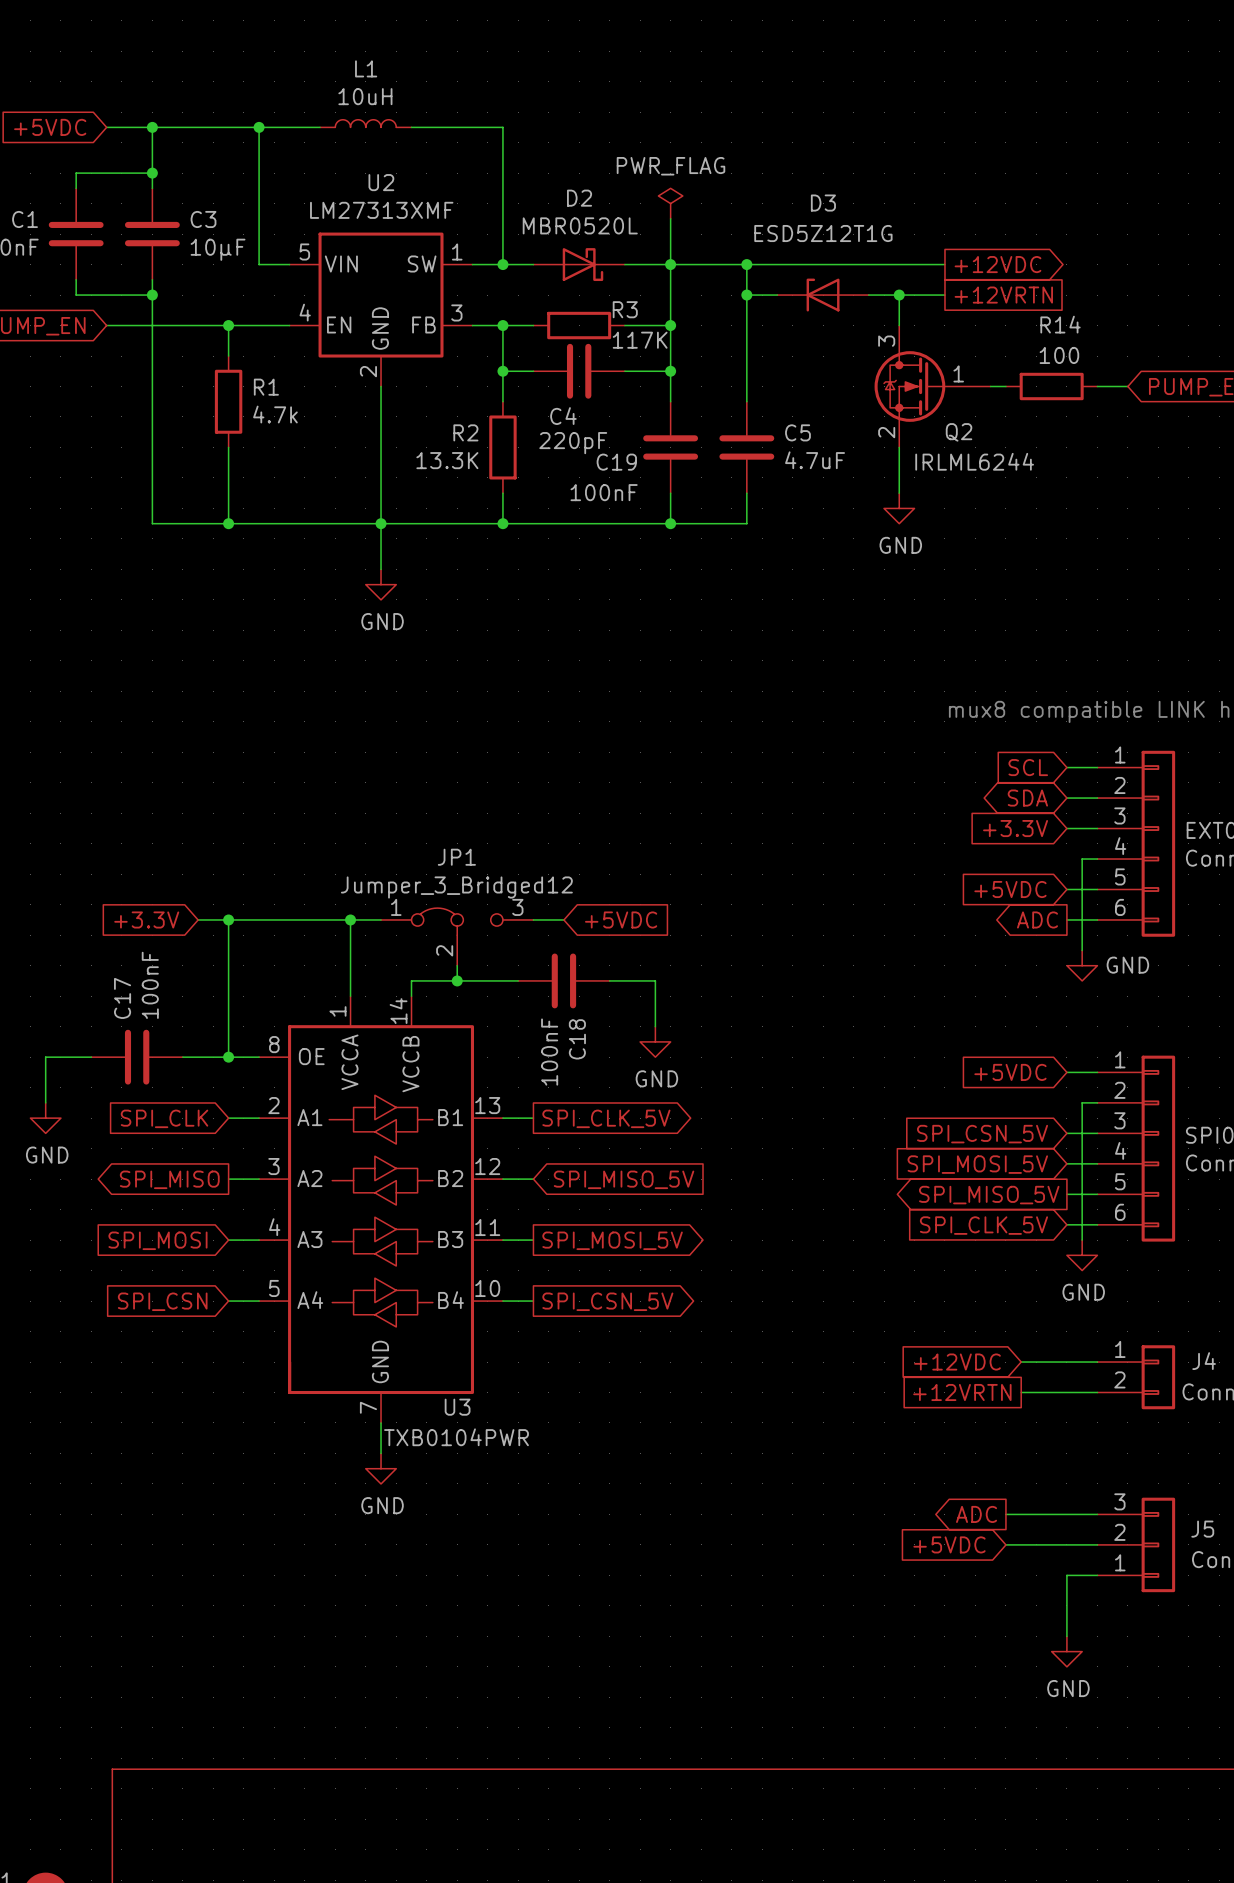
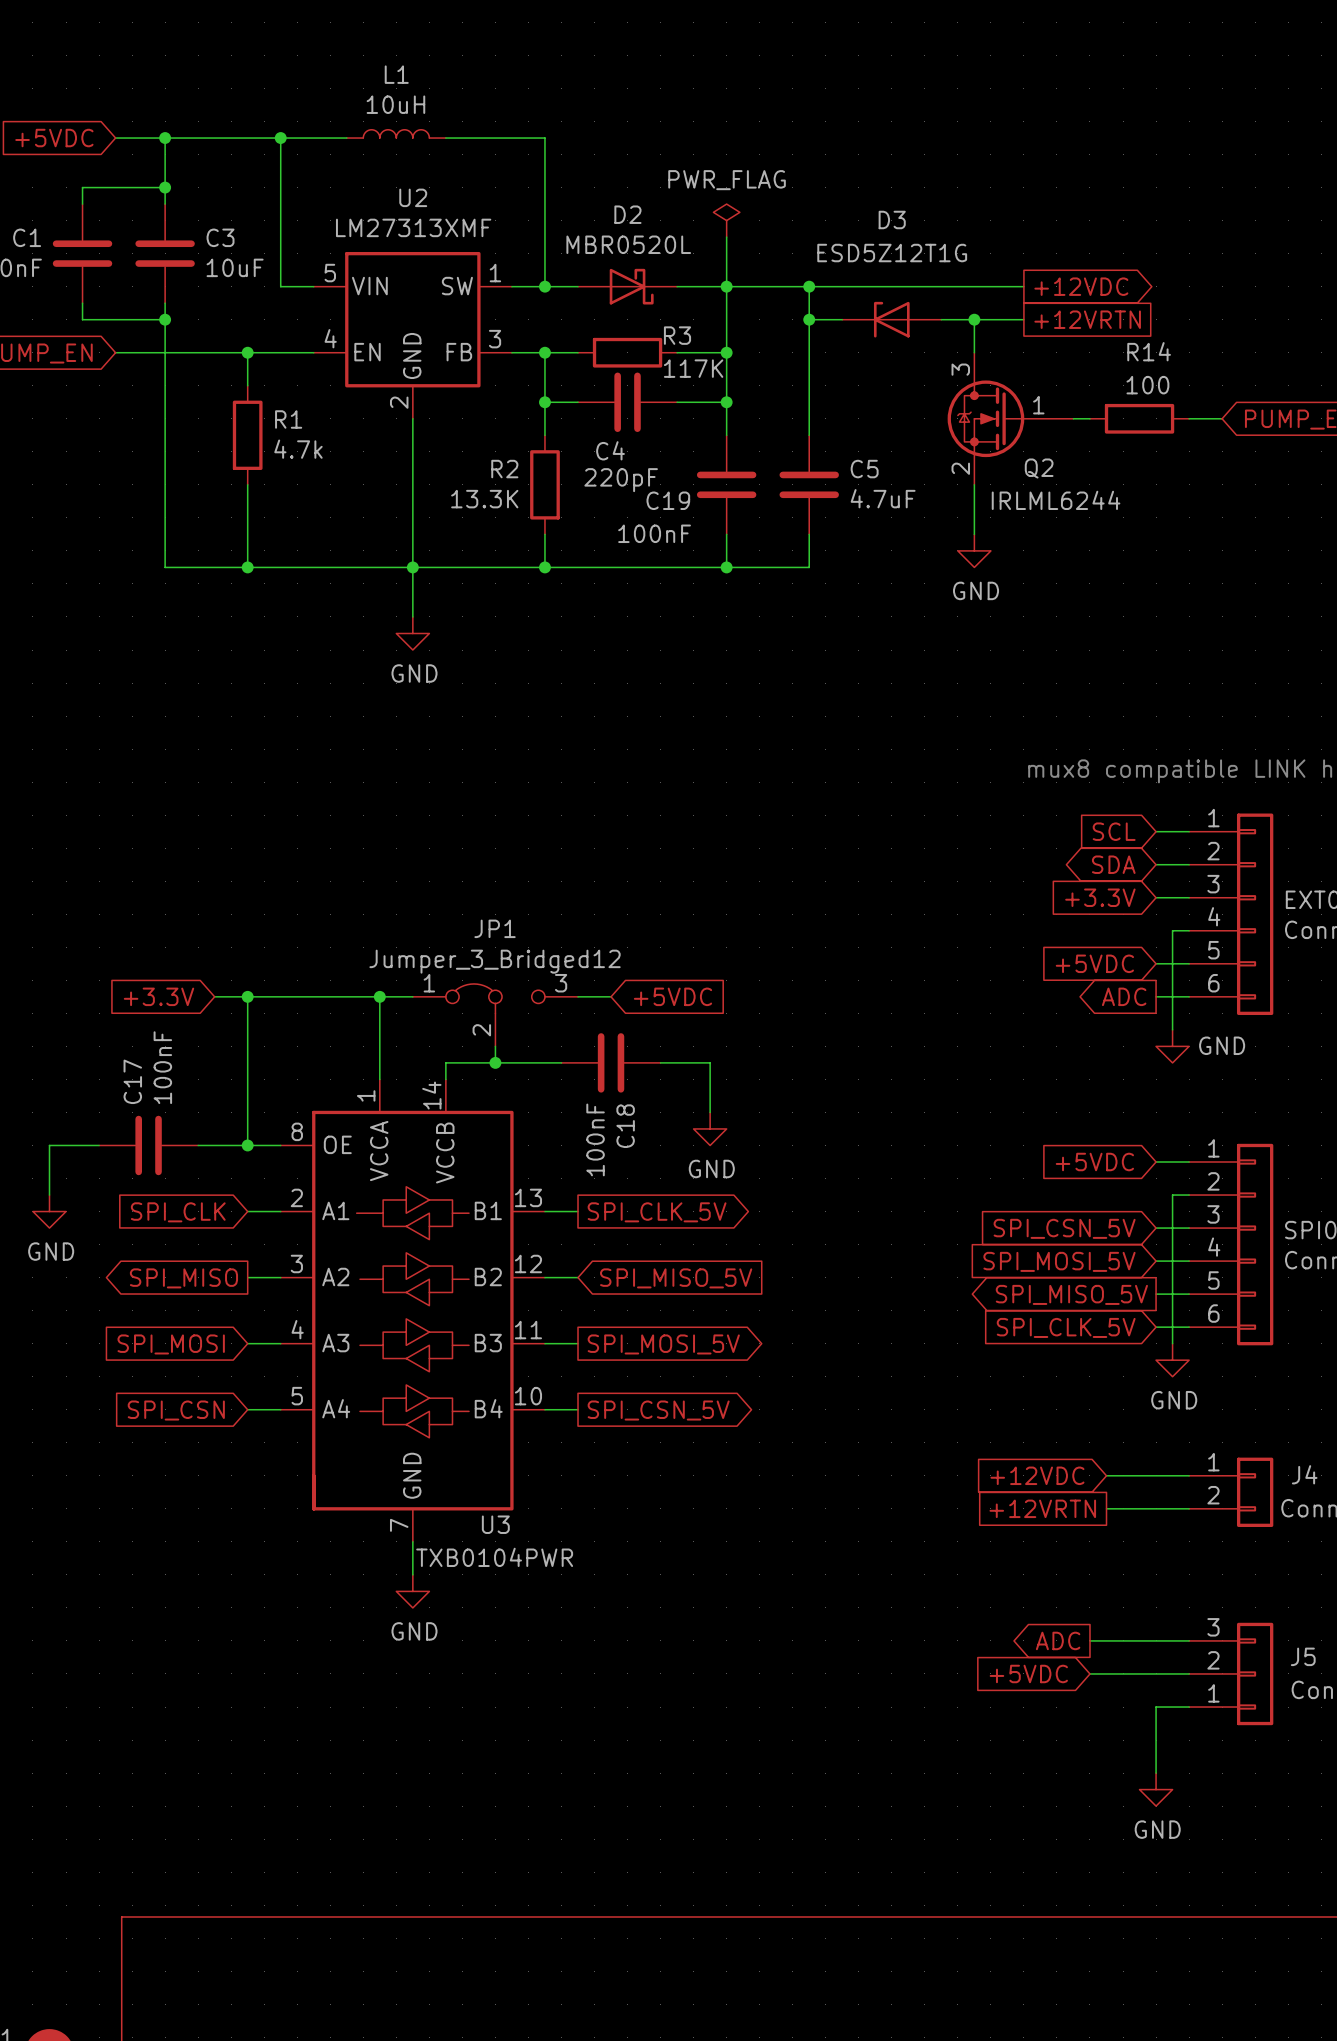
C3 value: 10µF (218, 249) -> 10uF (235, 267)

